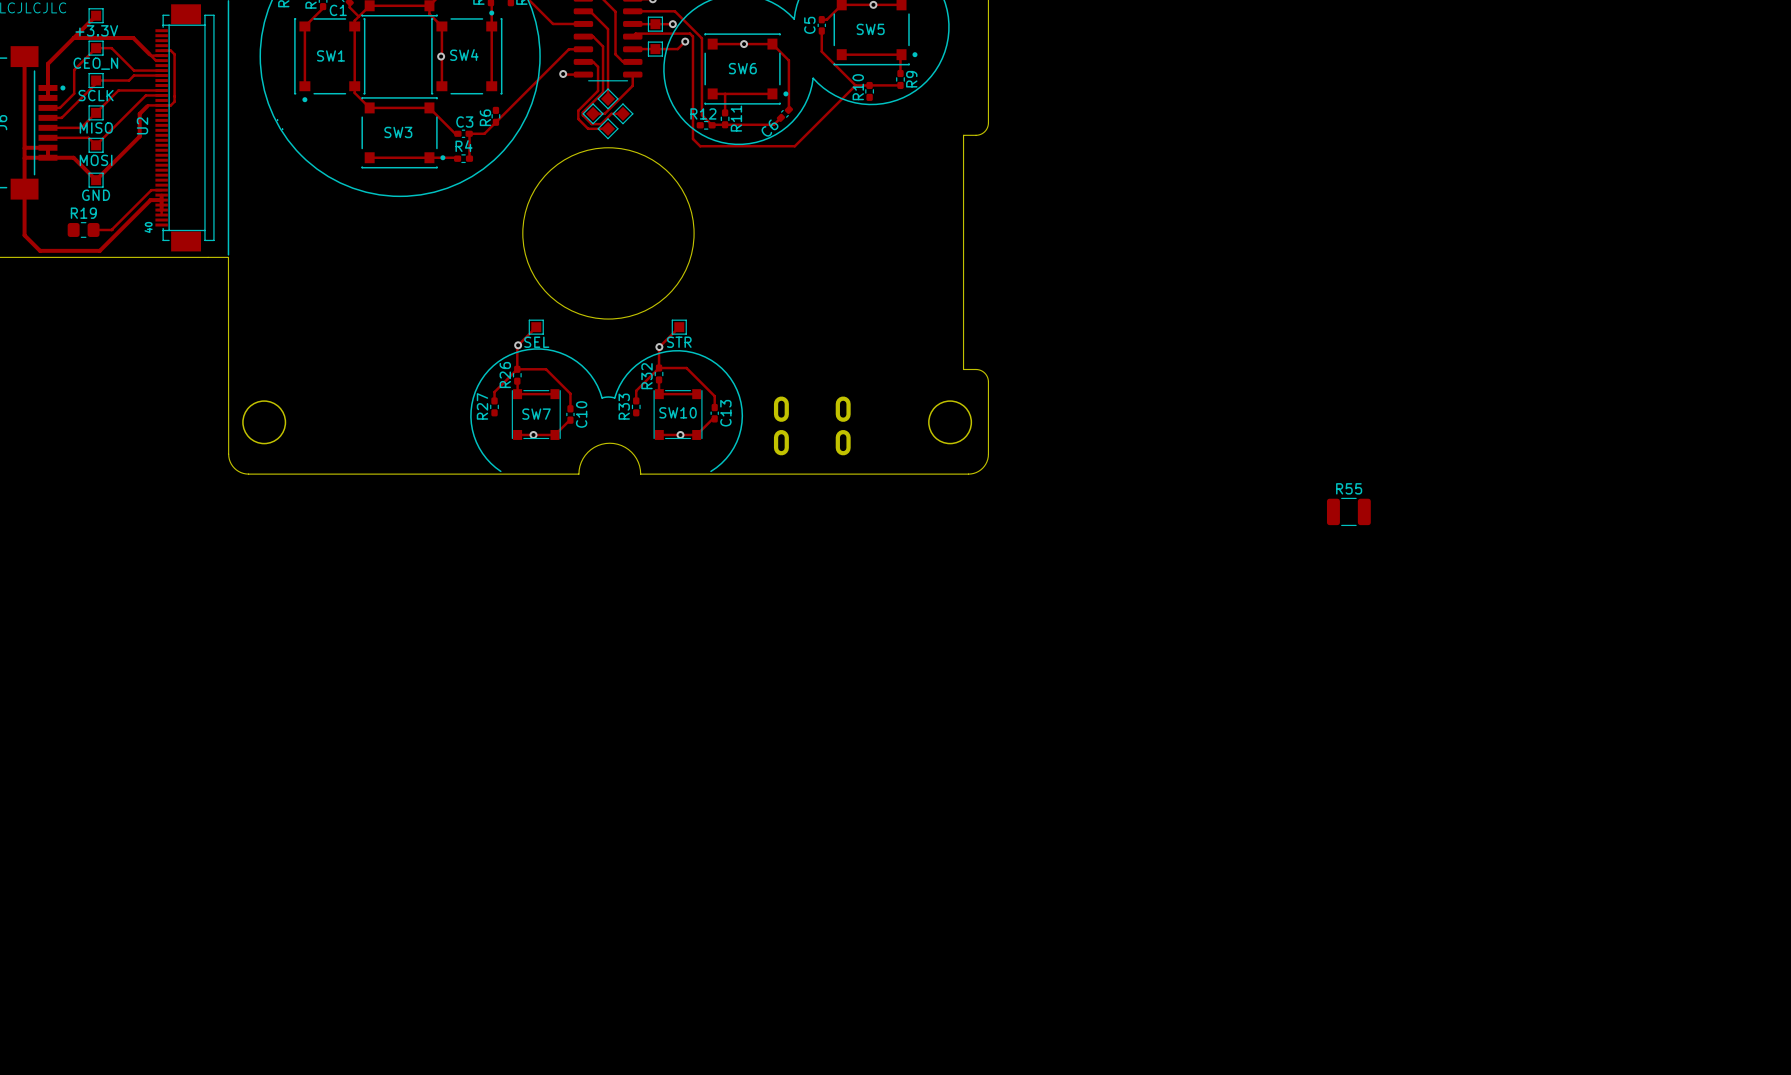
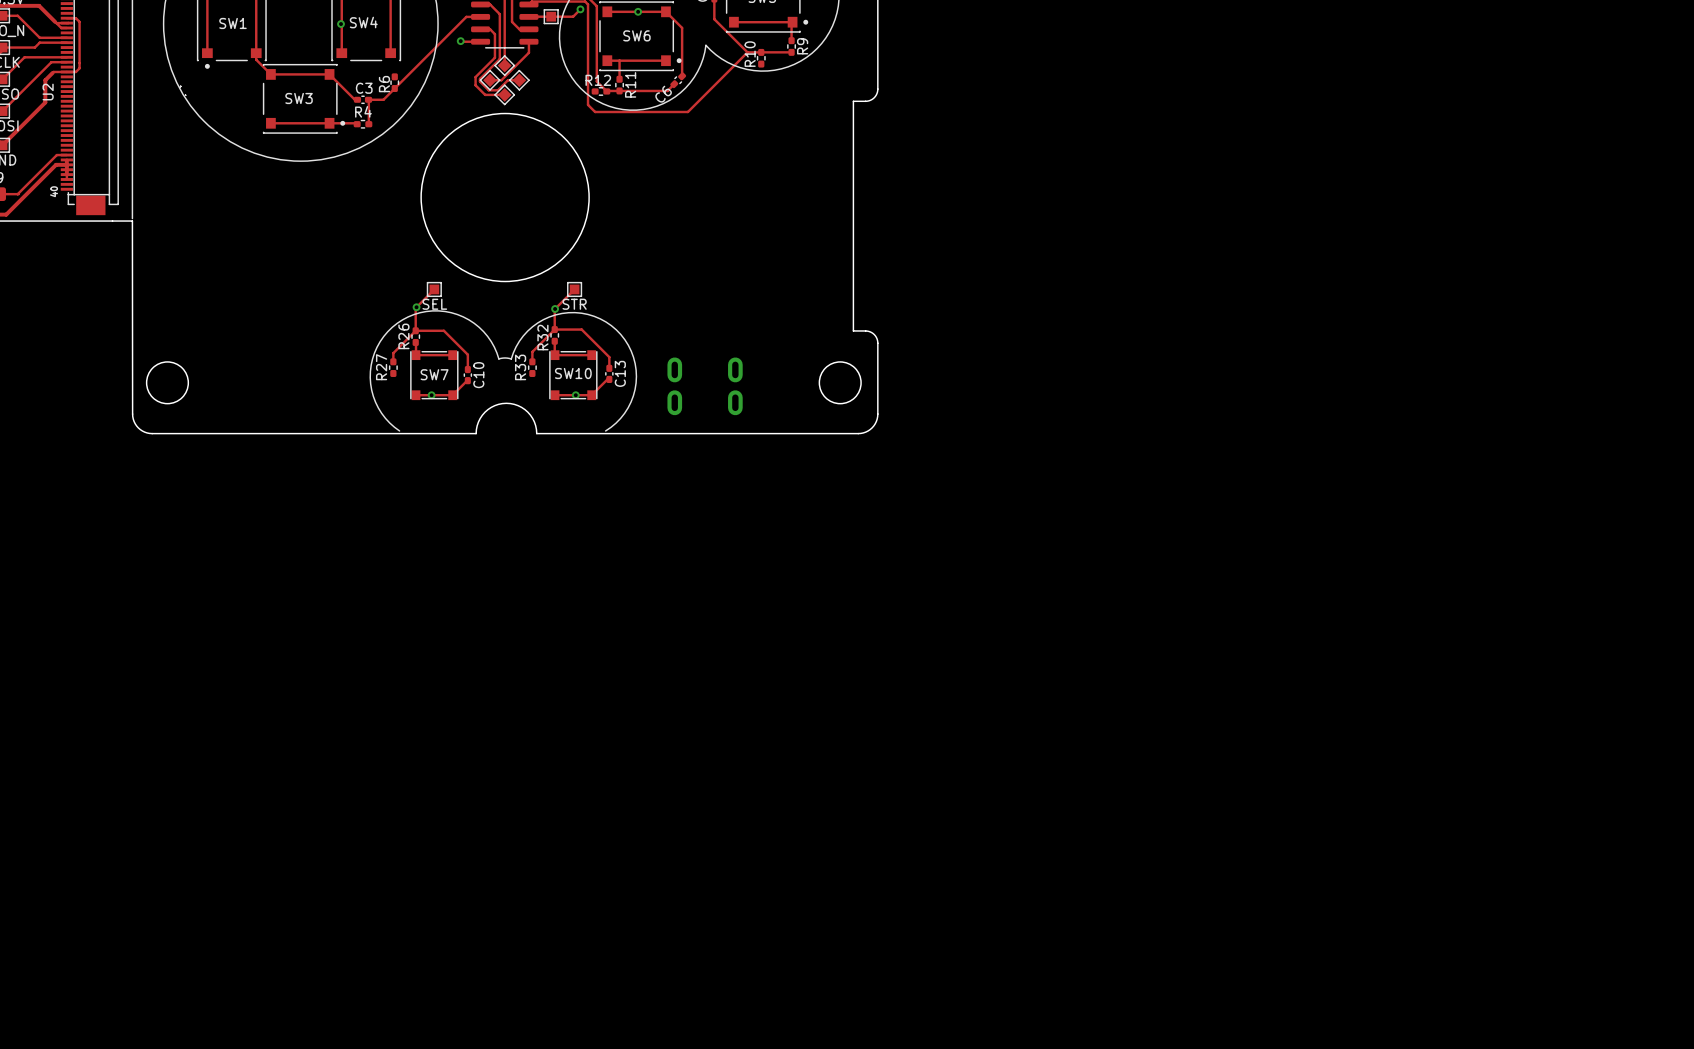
R55: (1348, 511) -> none

